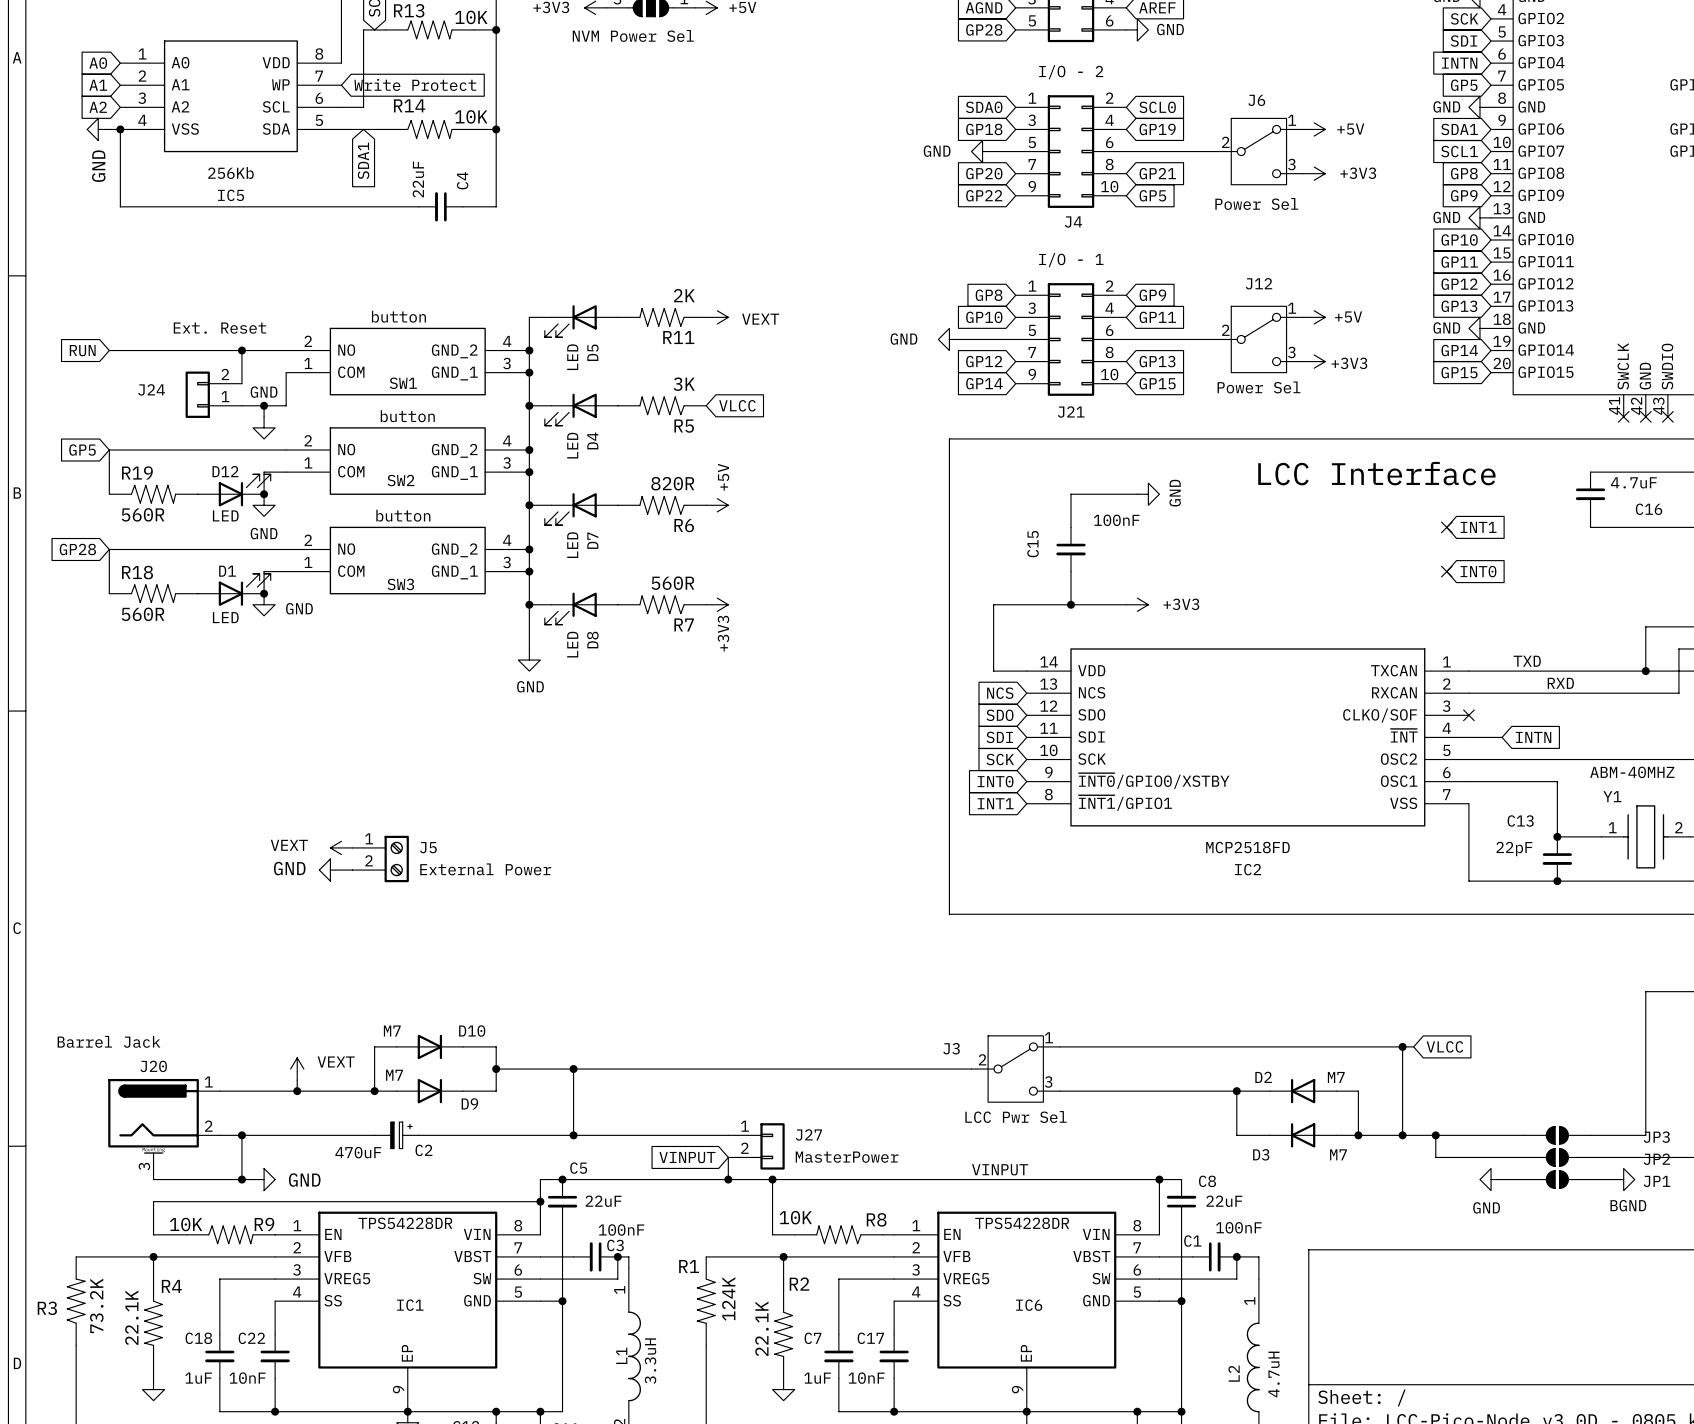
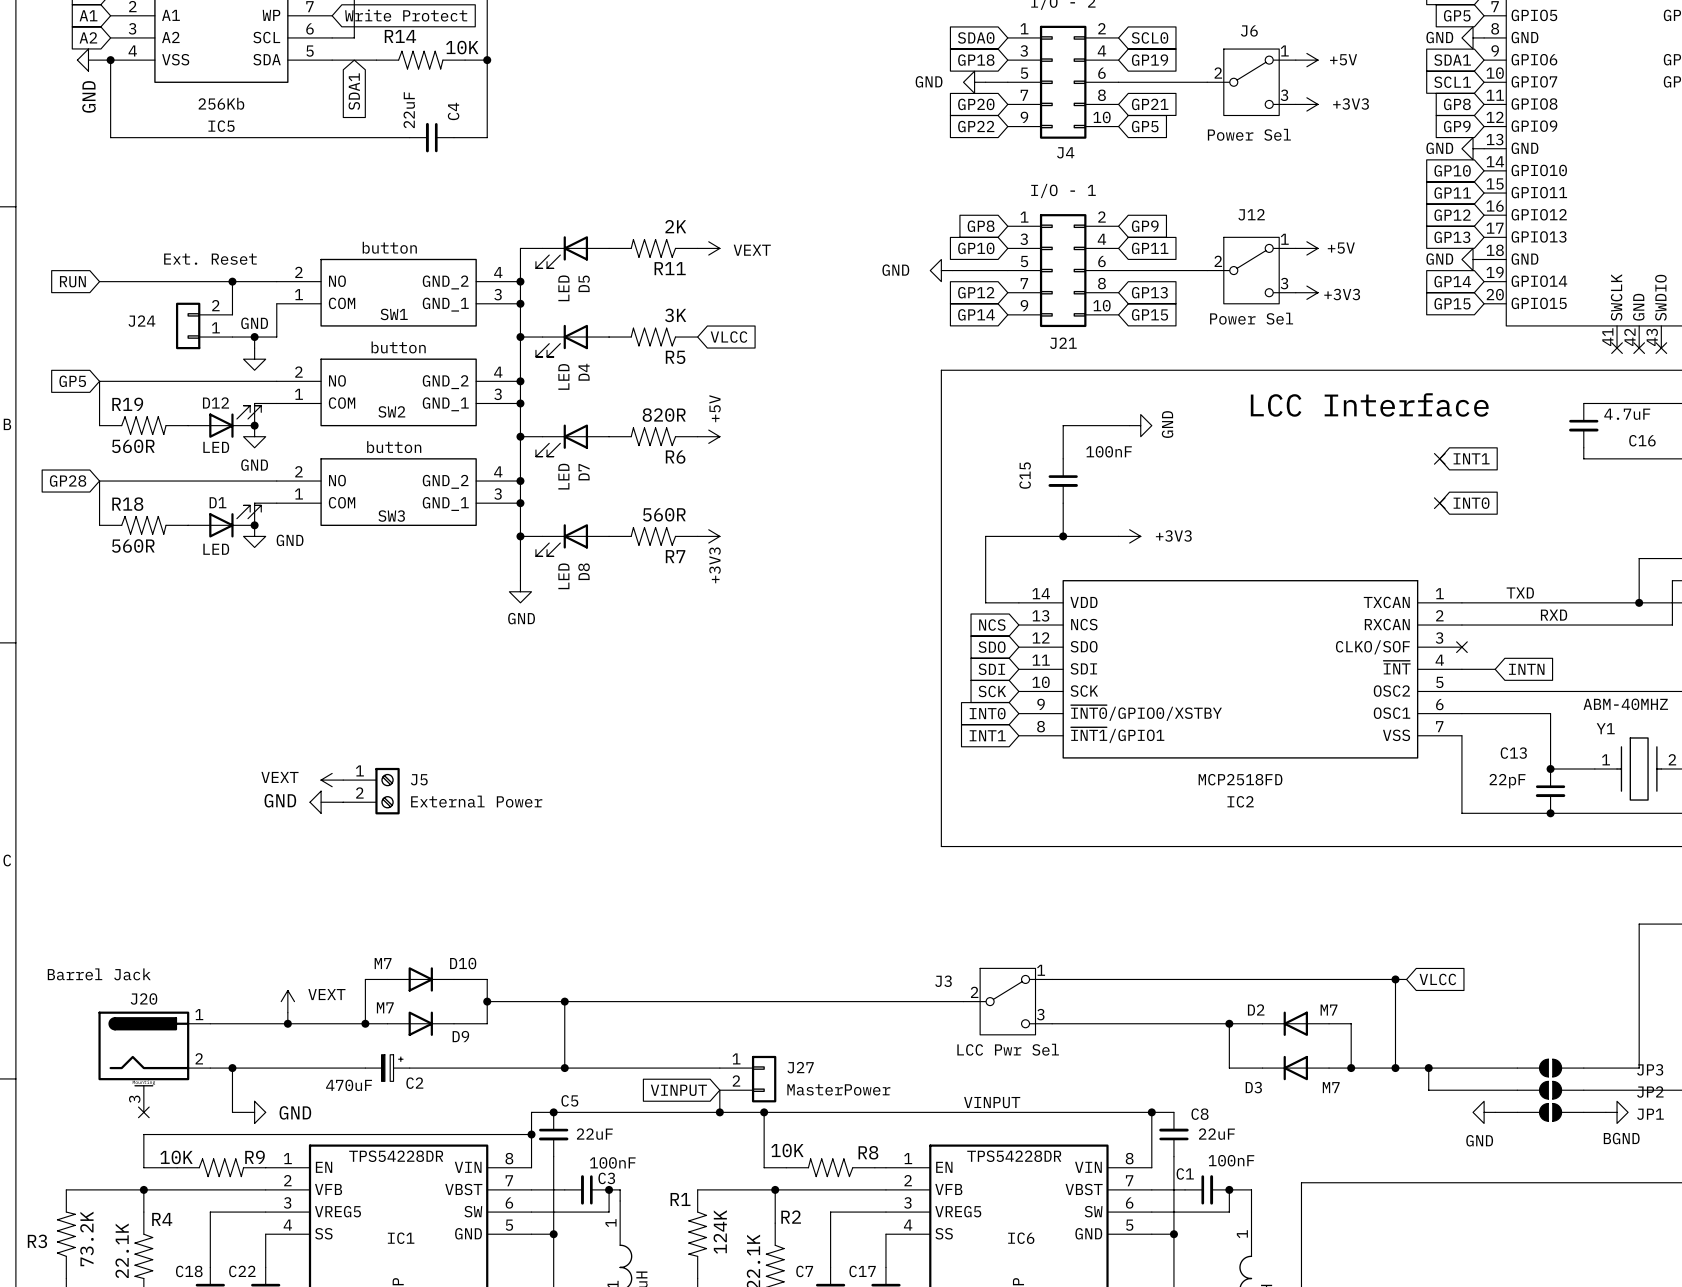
wire: (153, 1179) (241, 1179) -> none
no-connect mark: none -> (143, 1112)
junction: (241, 1179) -> none

